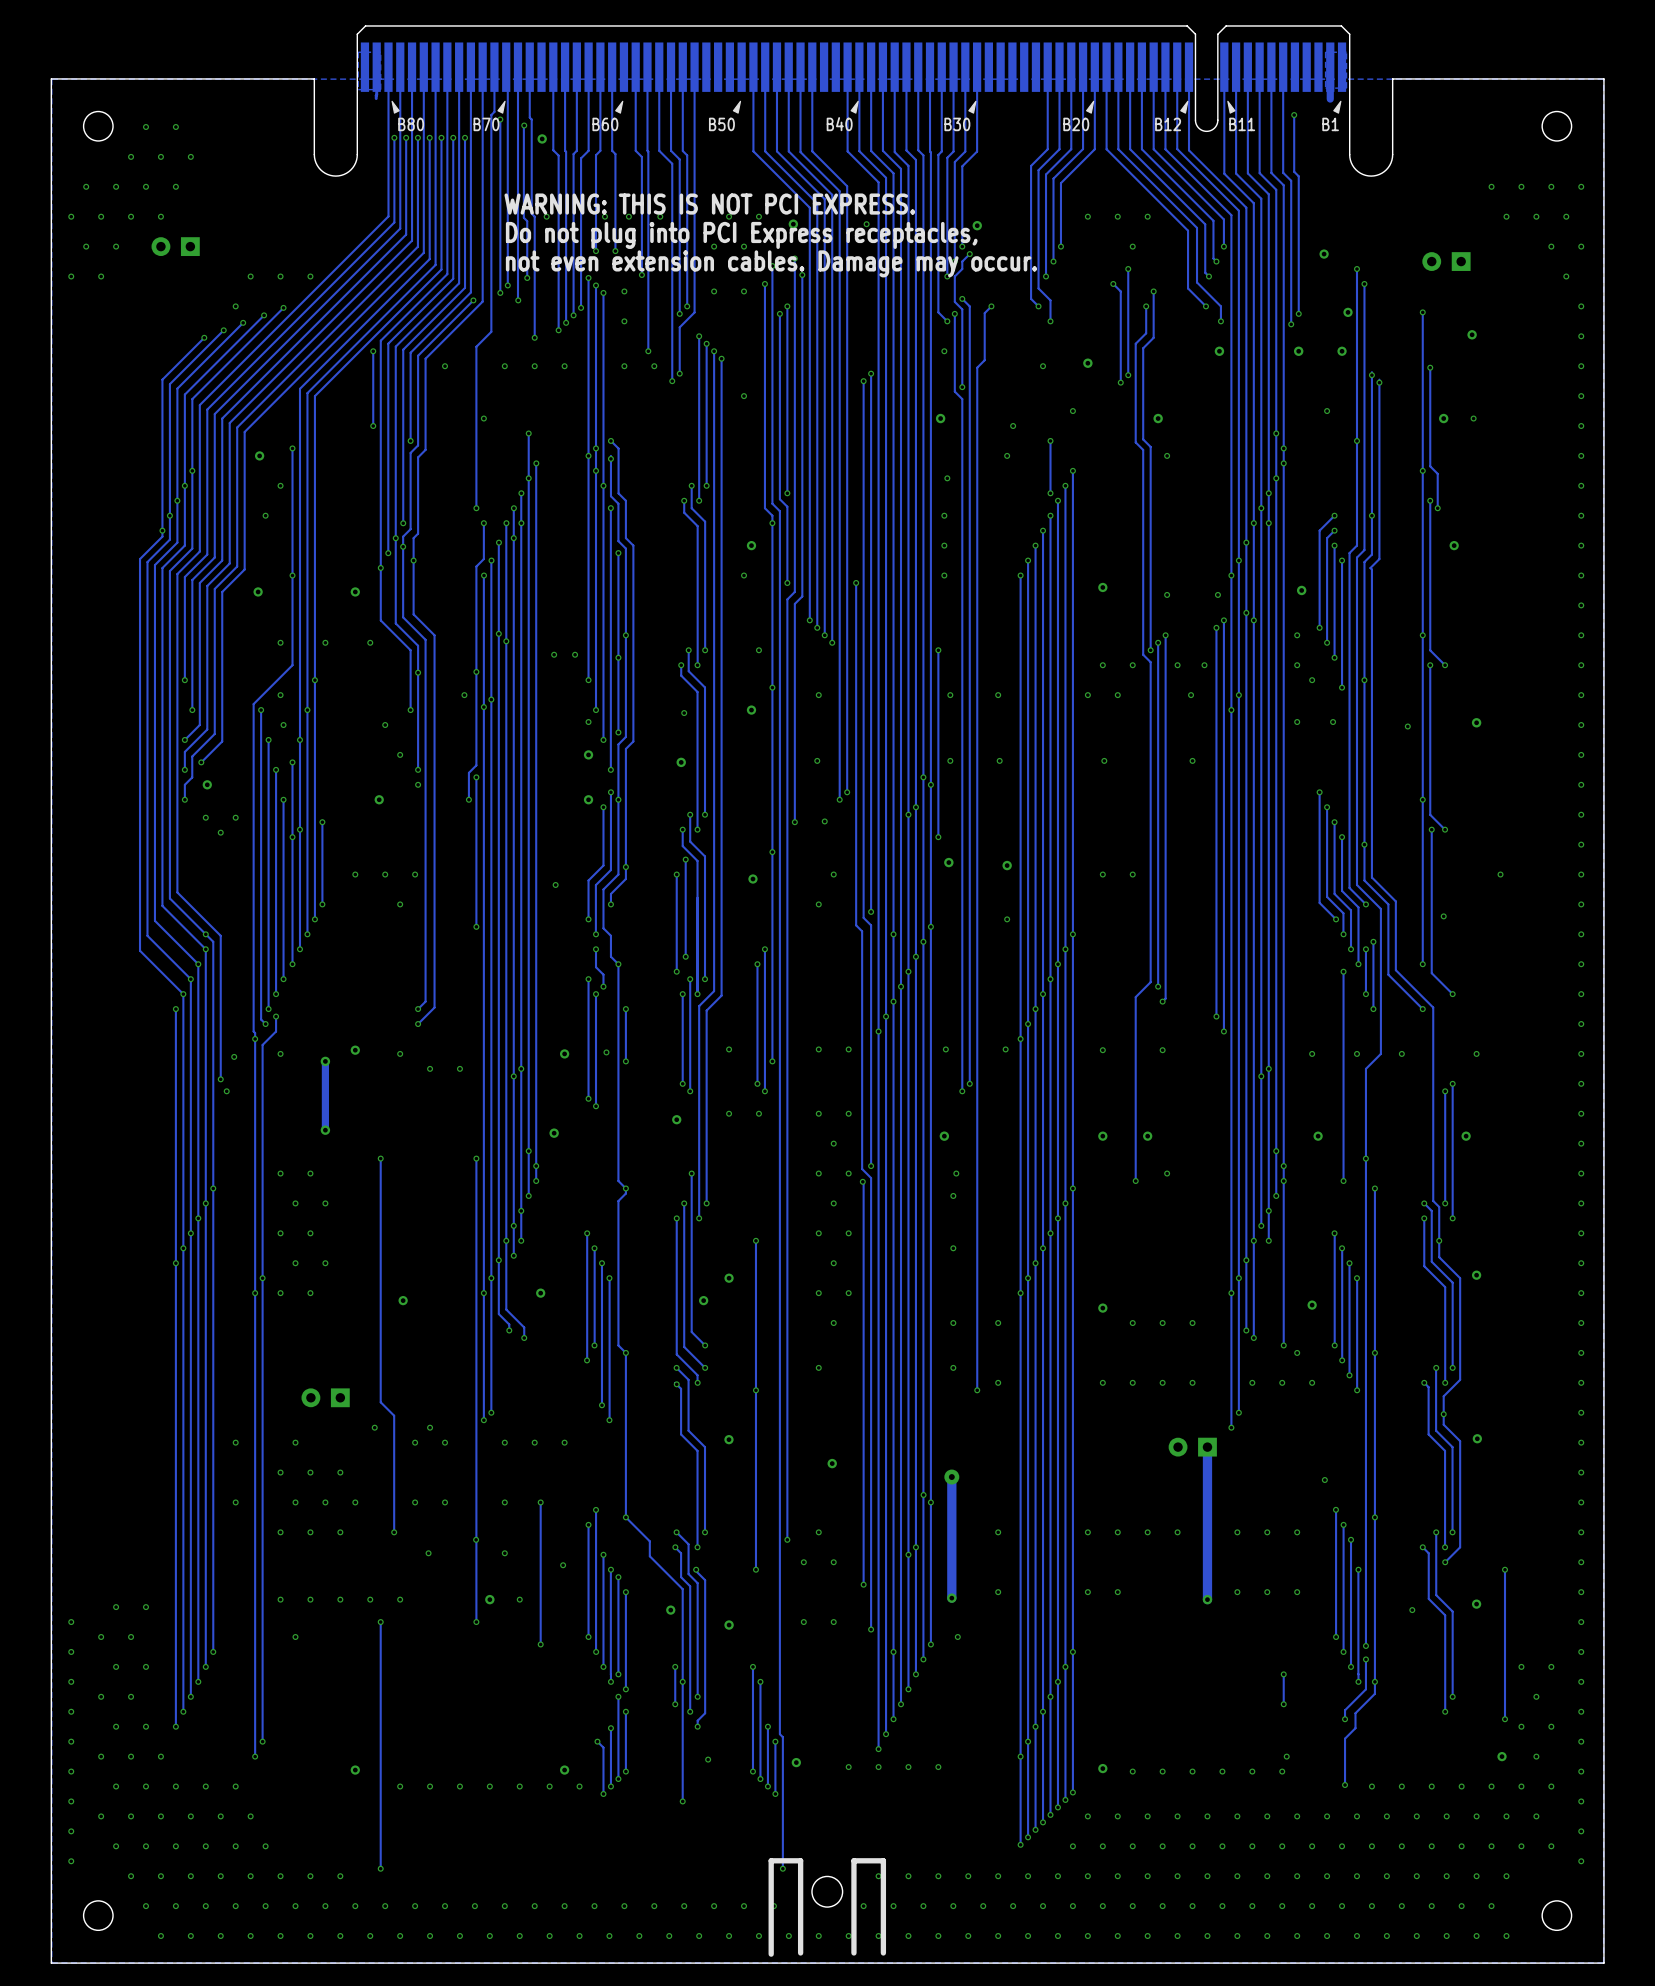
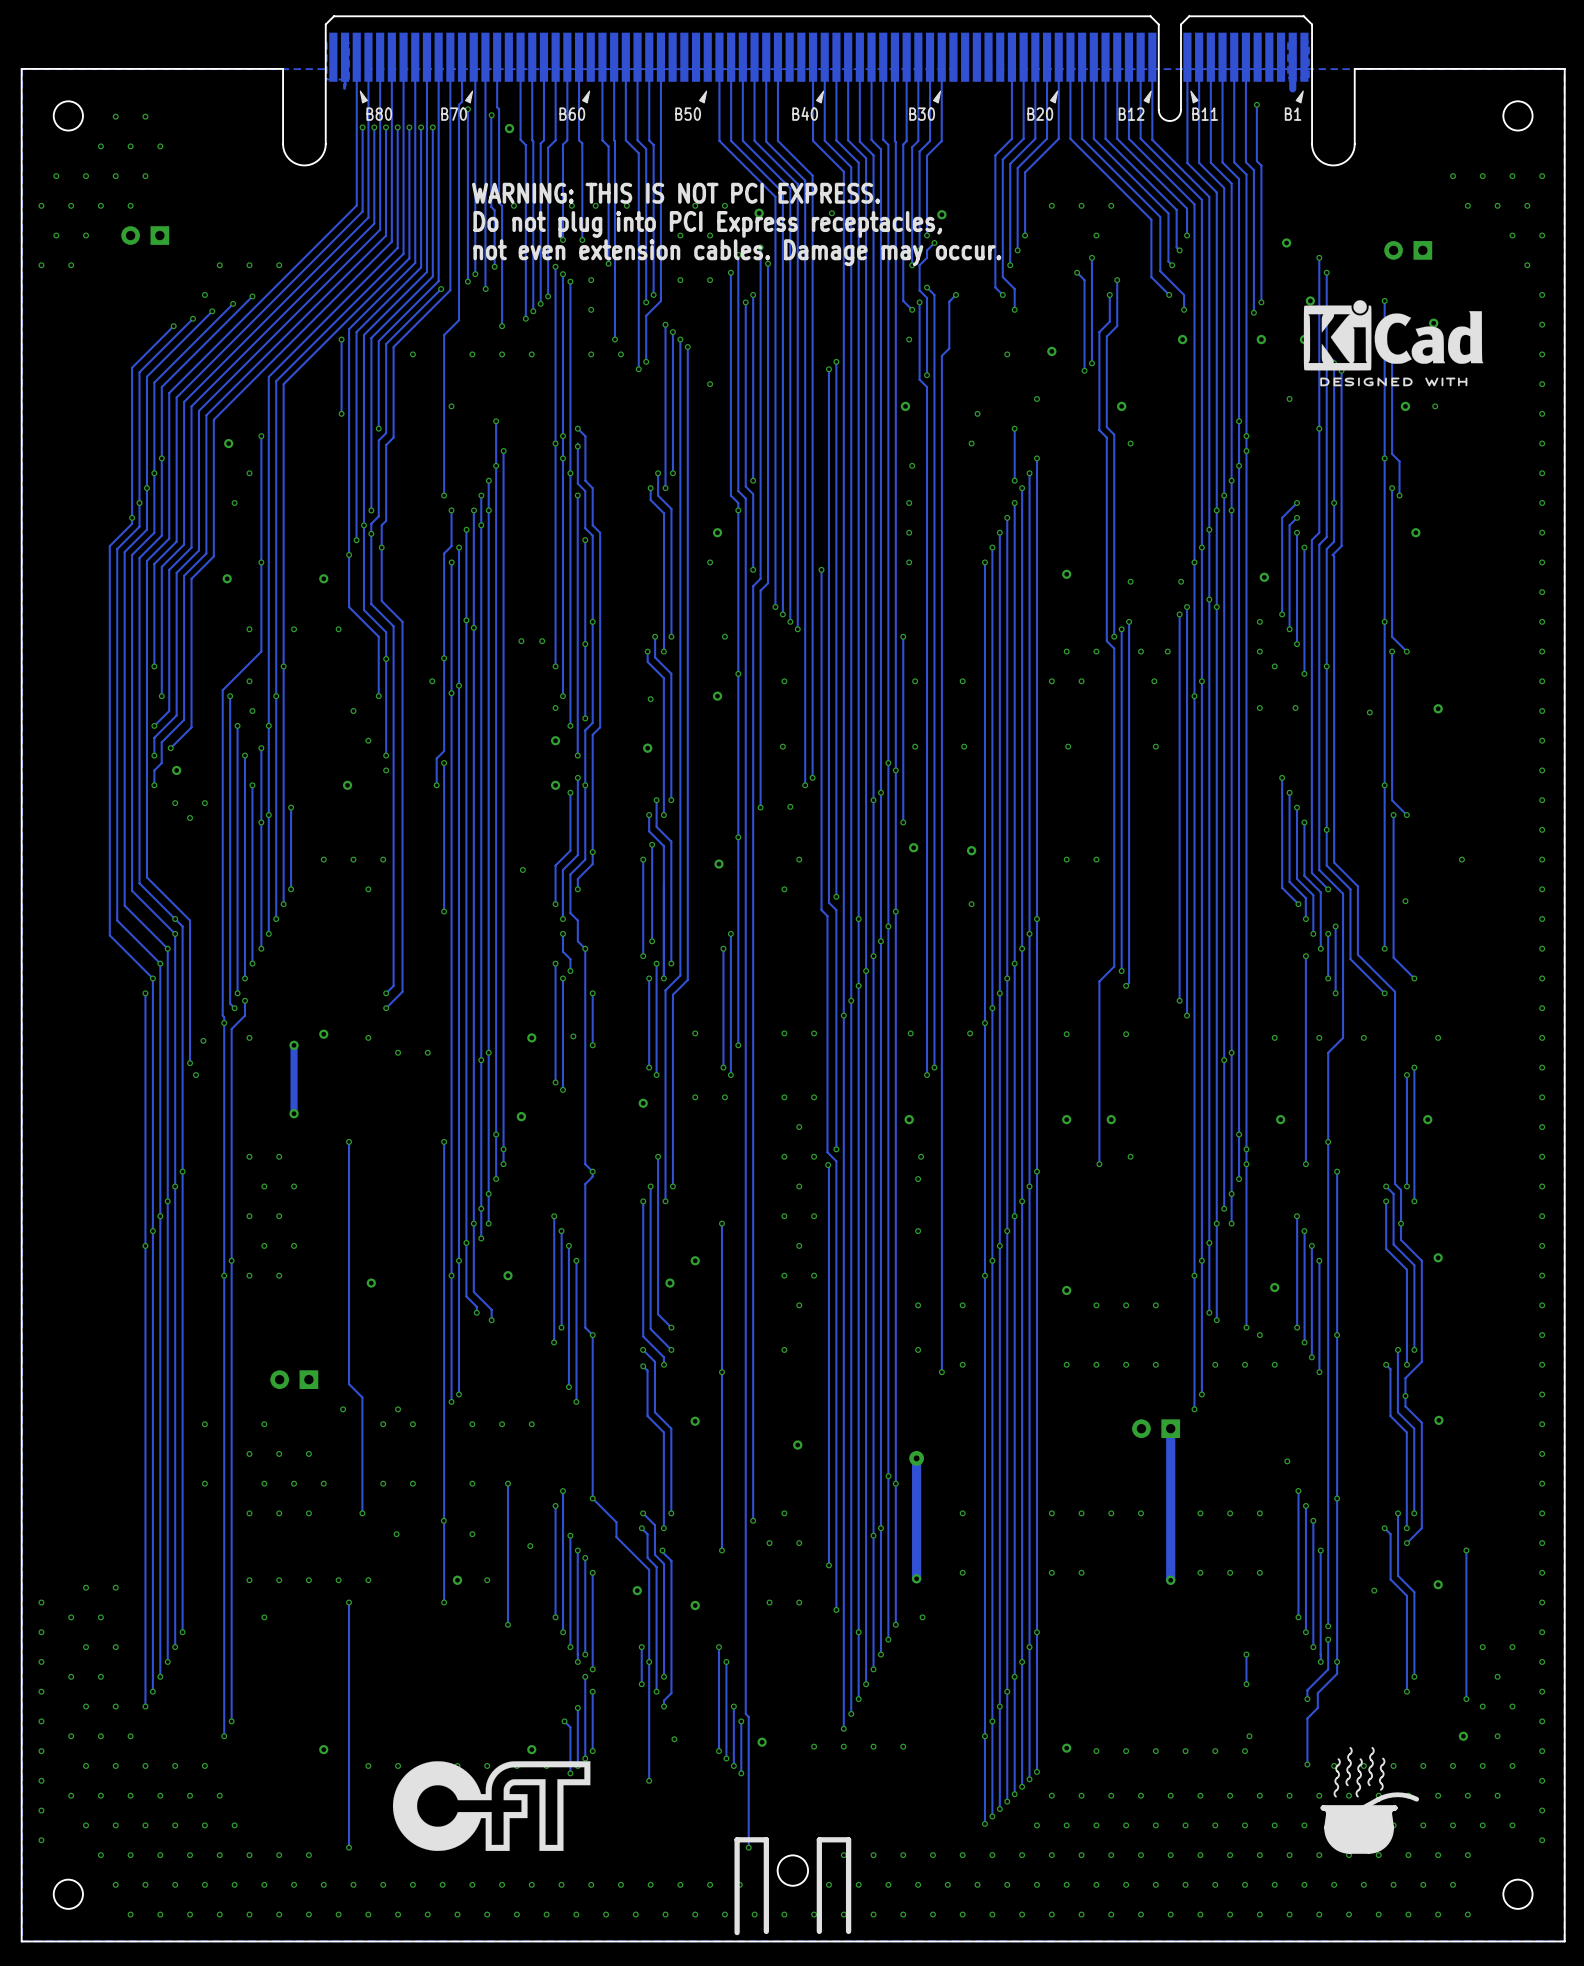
drawing: none -> [1303, 300, 1484, 387]
drawing: none -> [1320, 1747, 1420, 1854]
drawing: none -> [392, 1761, 591, 1851]

